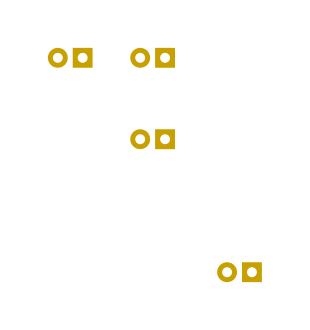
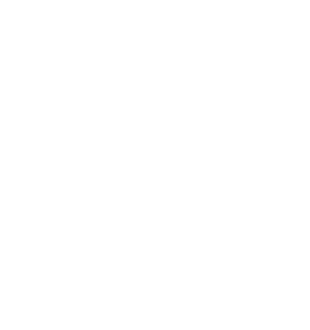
part: (70, 57) -> none
part: (152, 57) -> none
part: (152, 139) -> none
part: (239, 272) -> none

